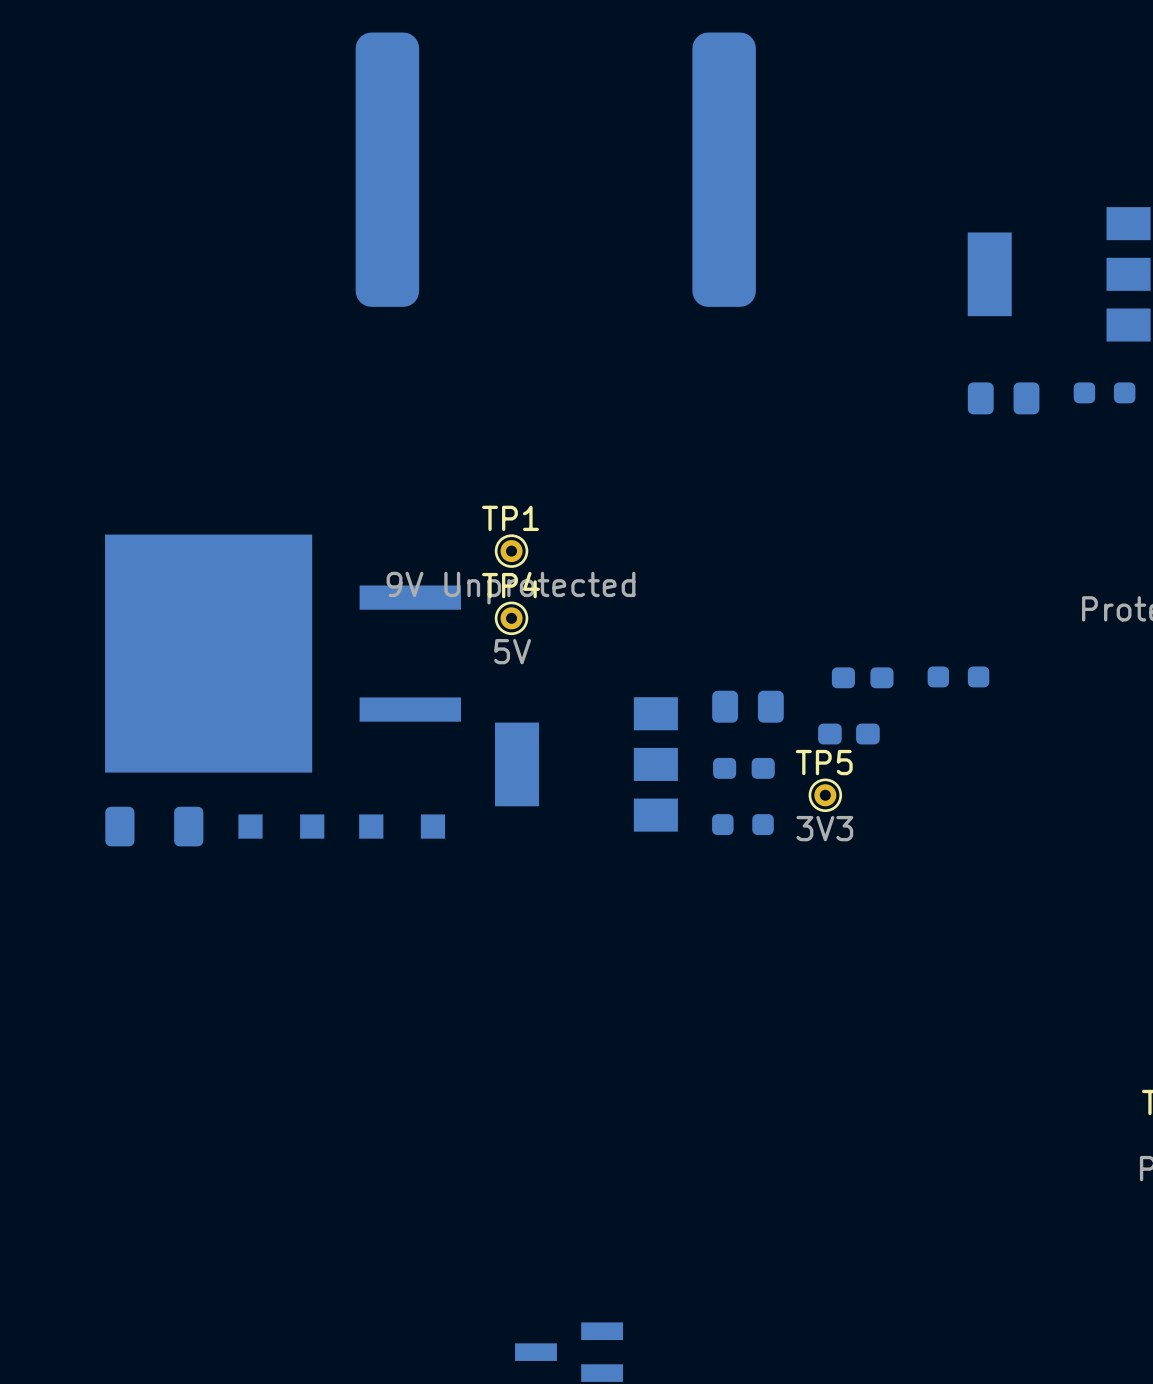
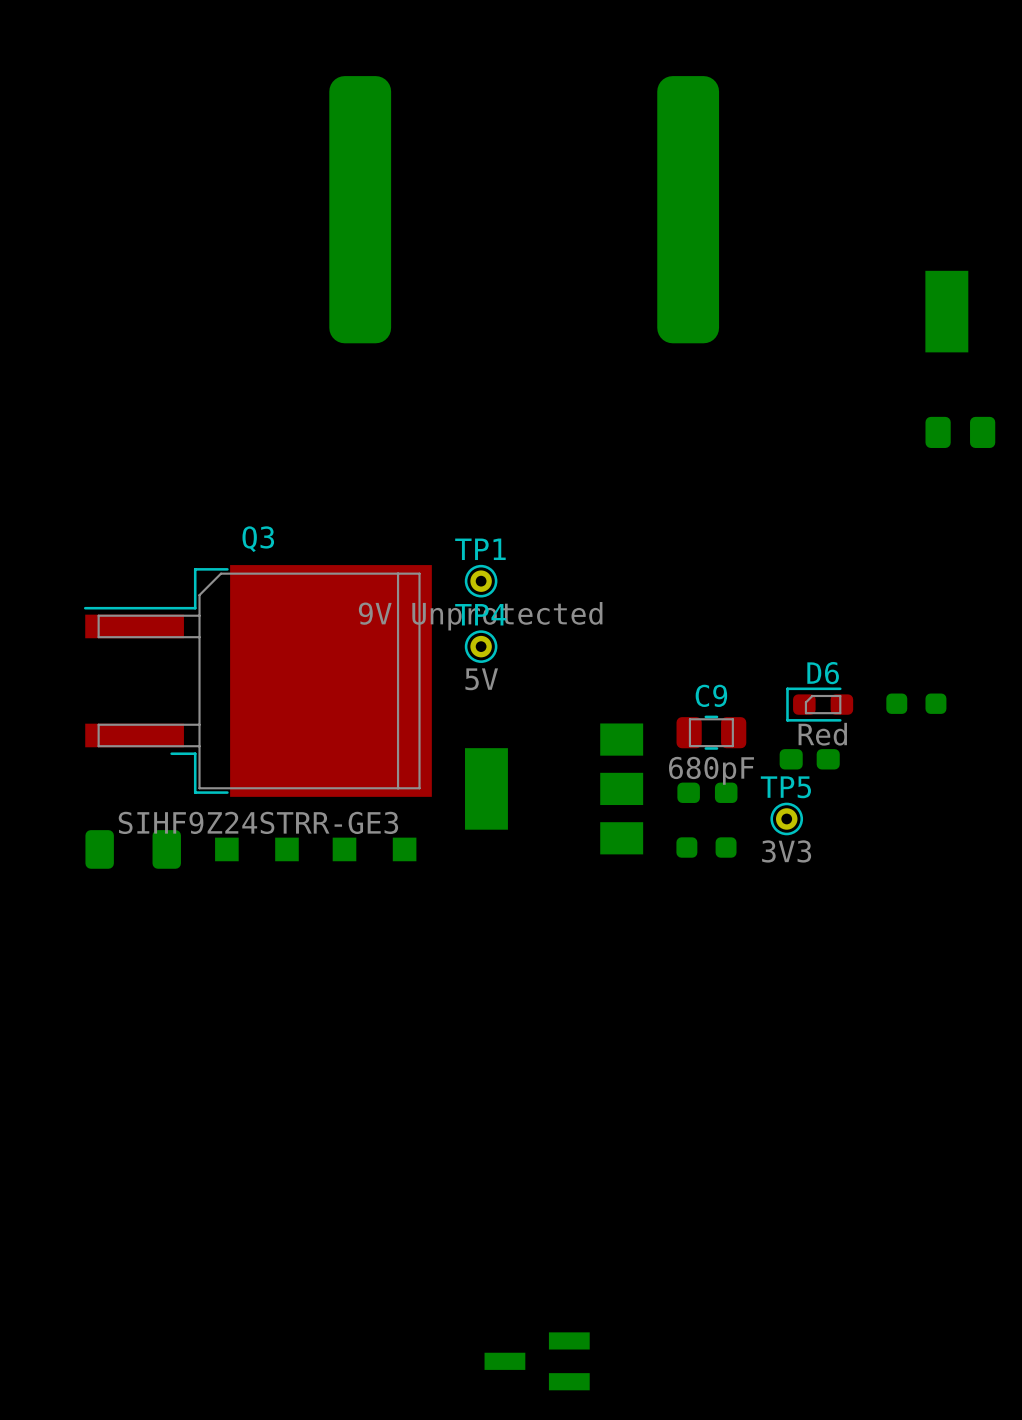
Q3 side: bottom (283, 653) -> top (257, 680)
D6 side: bottom (862, 677) -> top (819, 704)
C9 side: bottom (747, 706) -> top (711, 732)

